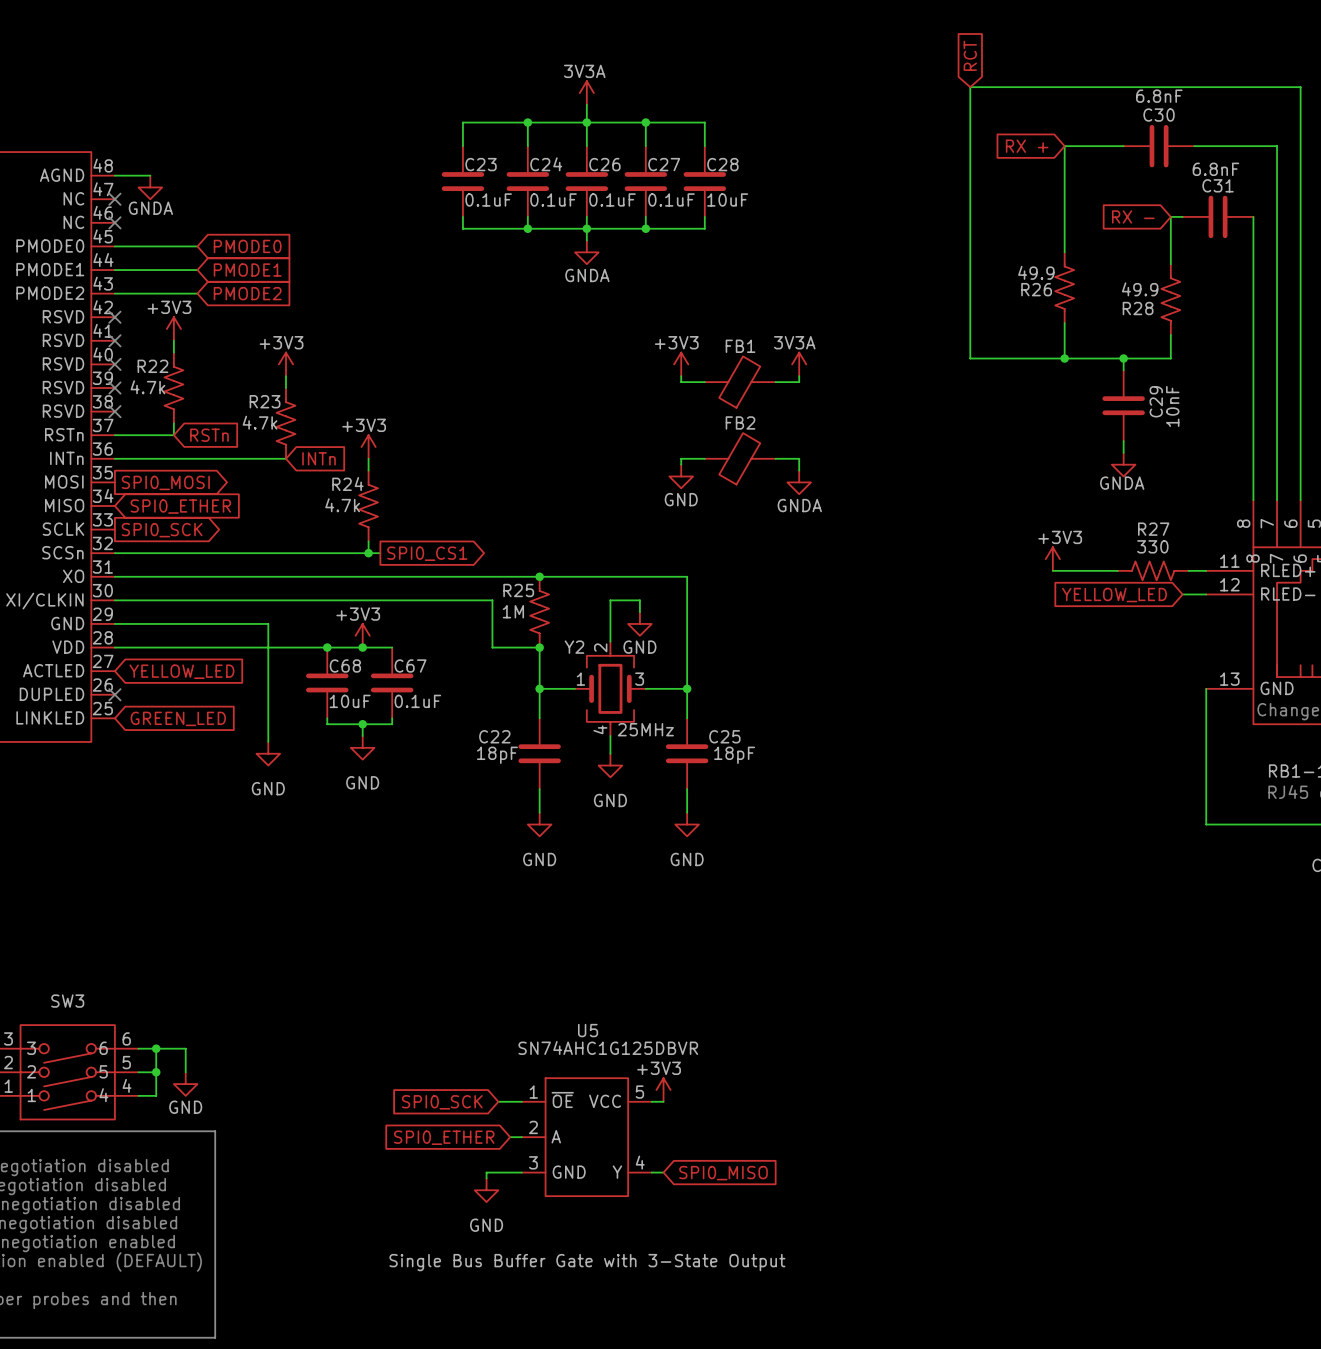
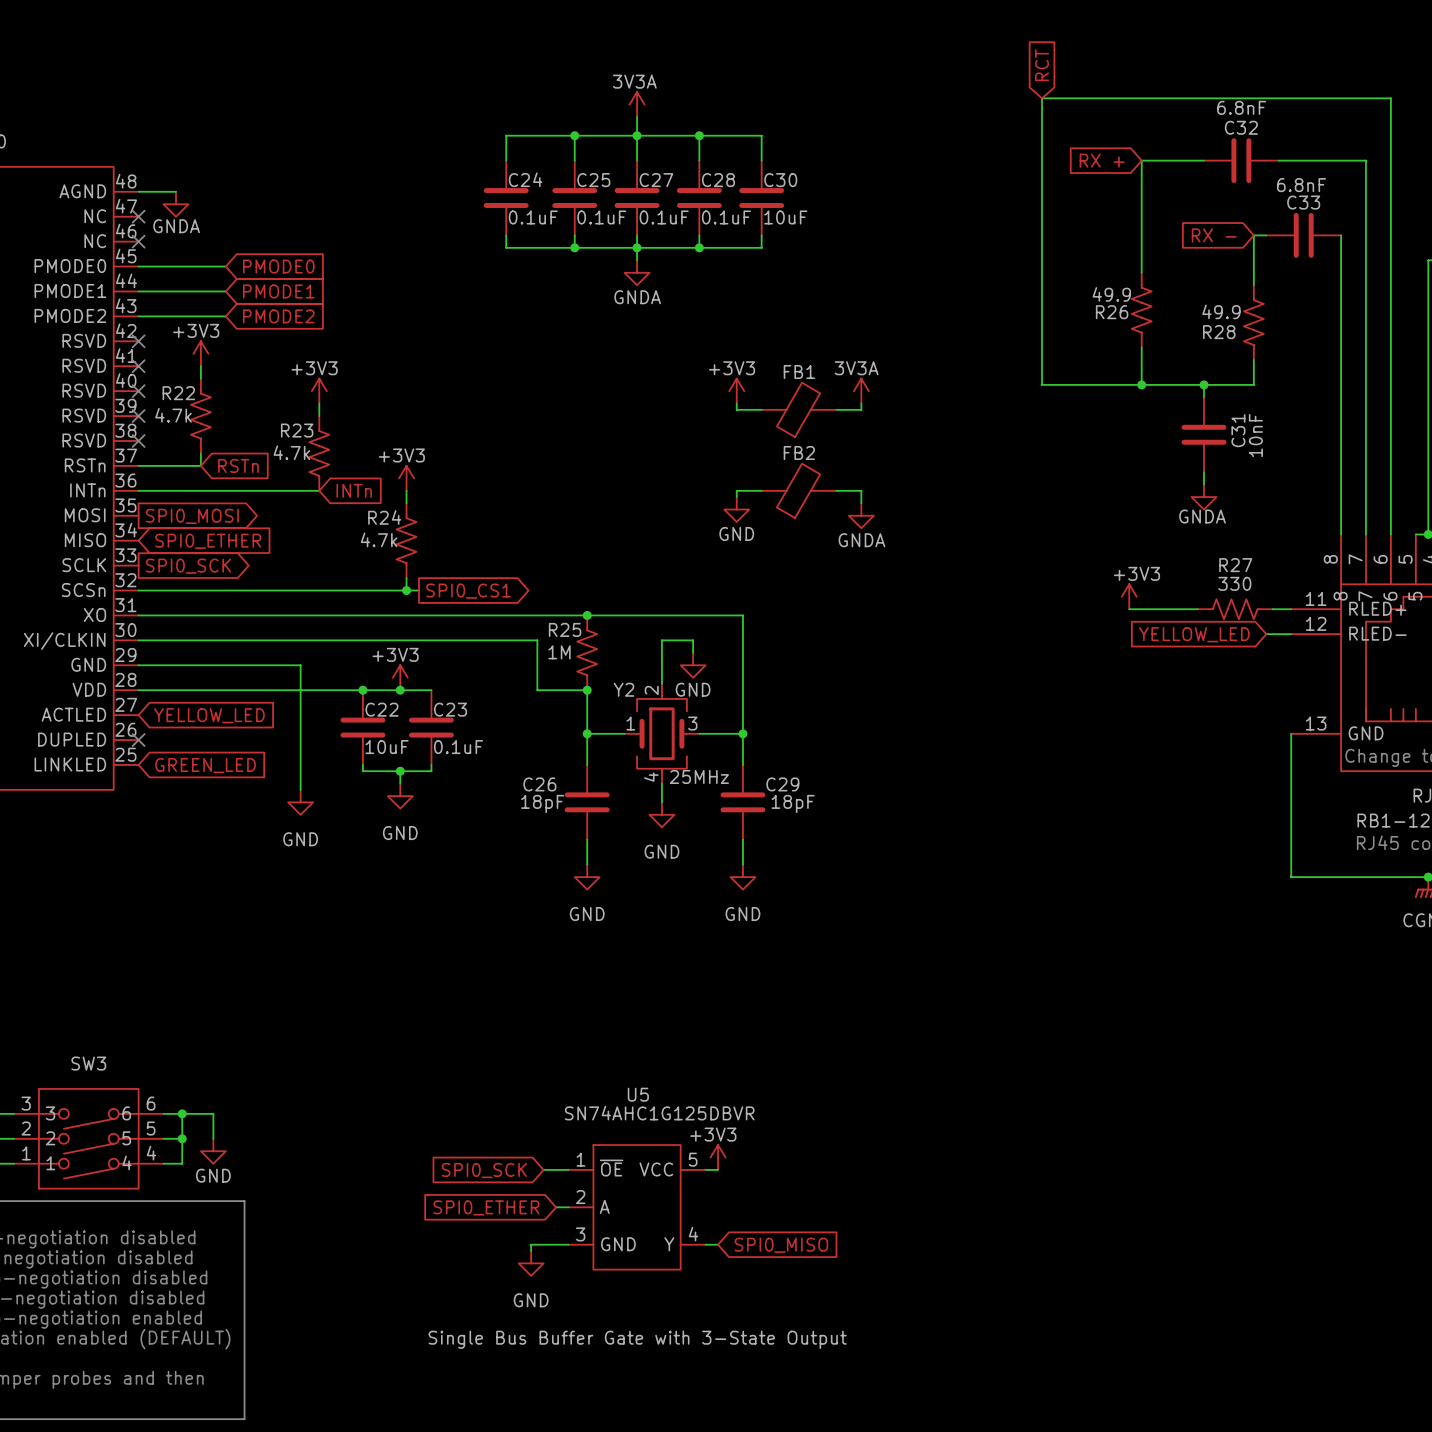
C30 name: C30 (1159, 115) -> C32 (1241, 127)
C23 name: C23 (481, 164) -> C24 (525, 179)
C24 name: C24 (546, 164) -> C25 (593, 180)
C26 name: C26 (604, 164) -> C27 (656, 180)
C27 name: C27 (664, 164) -> C28 (718, 180)
C28 name: C28 (722, 164) -> C30 (780, 180)
C31 name: C31 (1218, 185) -> C33 (1303, 202)
C29 name: C29 (1156, 401) -> C31 (1238, 430)
C68 name: C68 (345, 666) -> C22 (381, 709)
C67 name: C67 (410, 666) -> C23 (450, 709)
C22 name: C22 (494, 736) -> C26 (539, 784)
C25 name: C25 (724, 736) -> C29 (782, 784)

